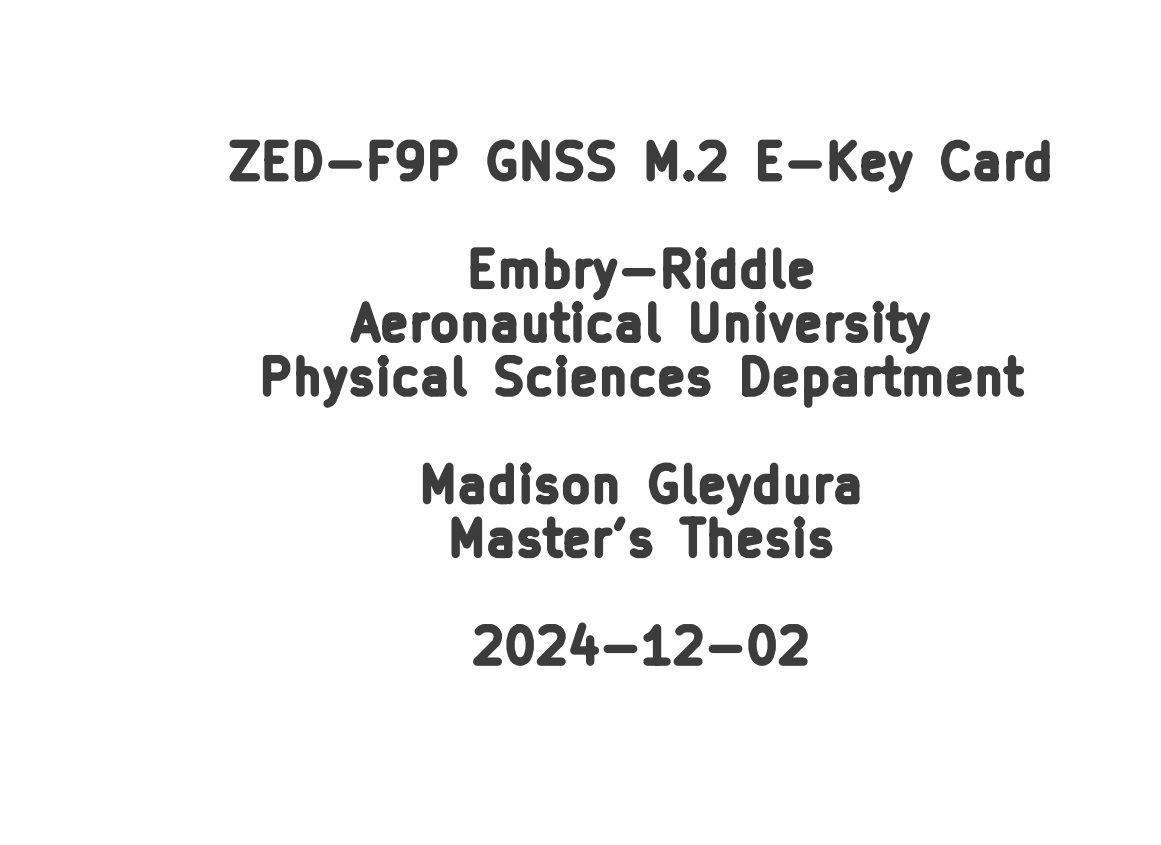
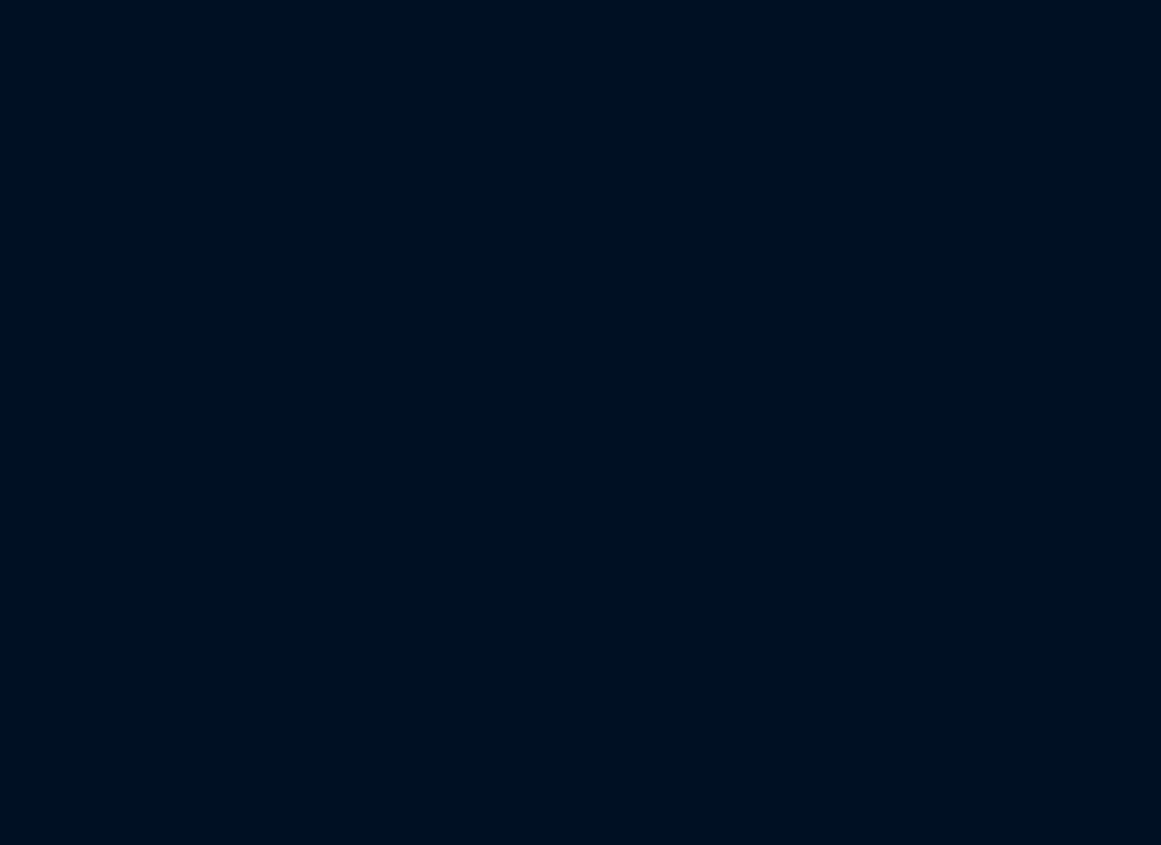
text: ZED-F9P GNSS M.2 E-Key Card (639, 166) -> none
text: Embry-Riddle (641, 273) -> none
text: Aeronautical University (640, 327) -> none
text: Physical Sciences Department (643, 381) -> none
text: Madison Gleydura (641, 489) -> none
text: Master's Thesis (641, 537) -> none
text: 2024-12-02 (640, 644) -> none

